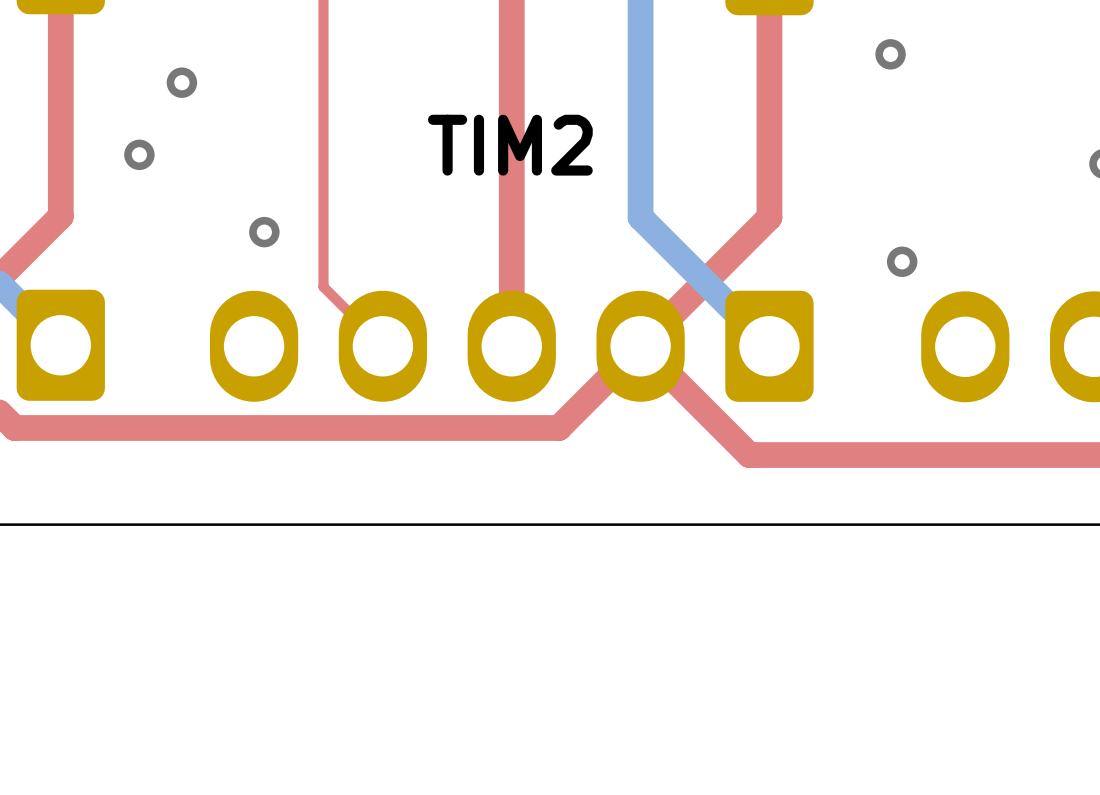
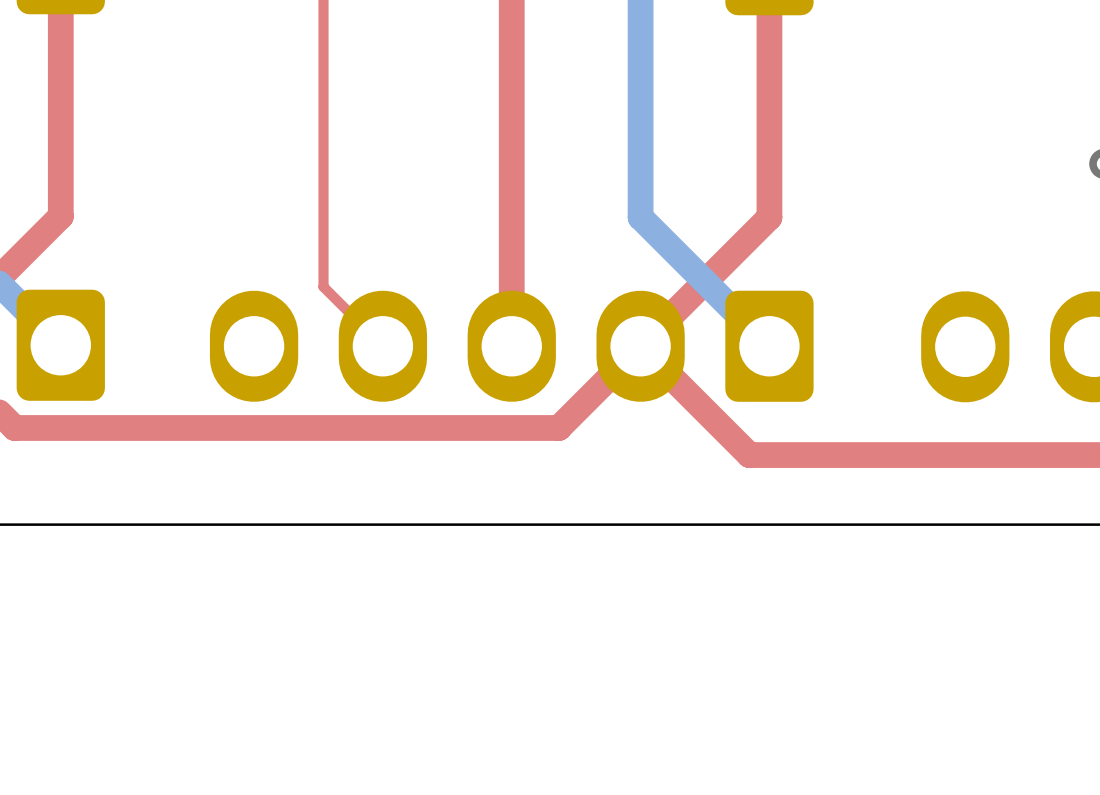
via: (890, 54) -> none
via: (181, 82) -> none
text: TIM2 (510, 145) -> none
via: (139, 154) -> none
via: (264, 232) -> none
via: (902, 261) -> none

